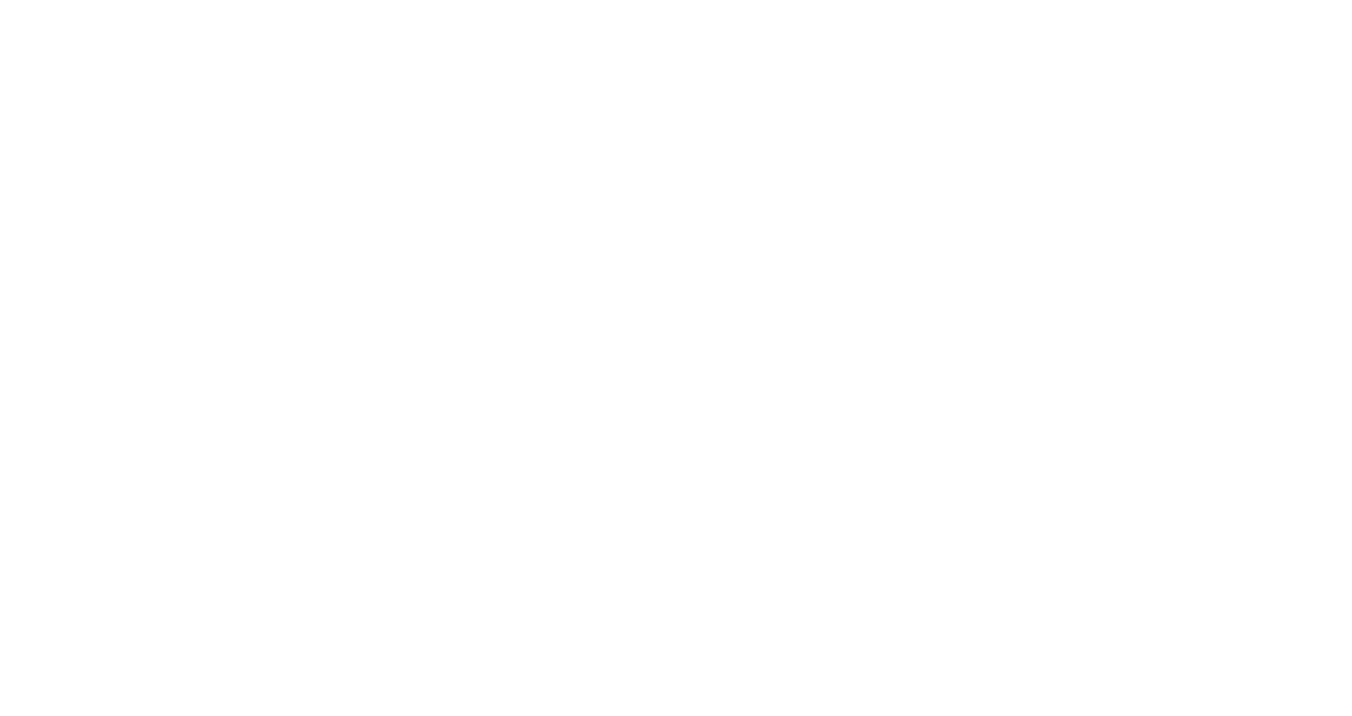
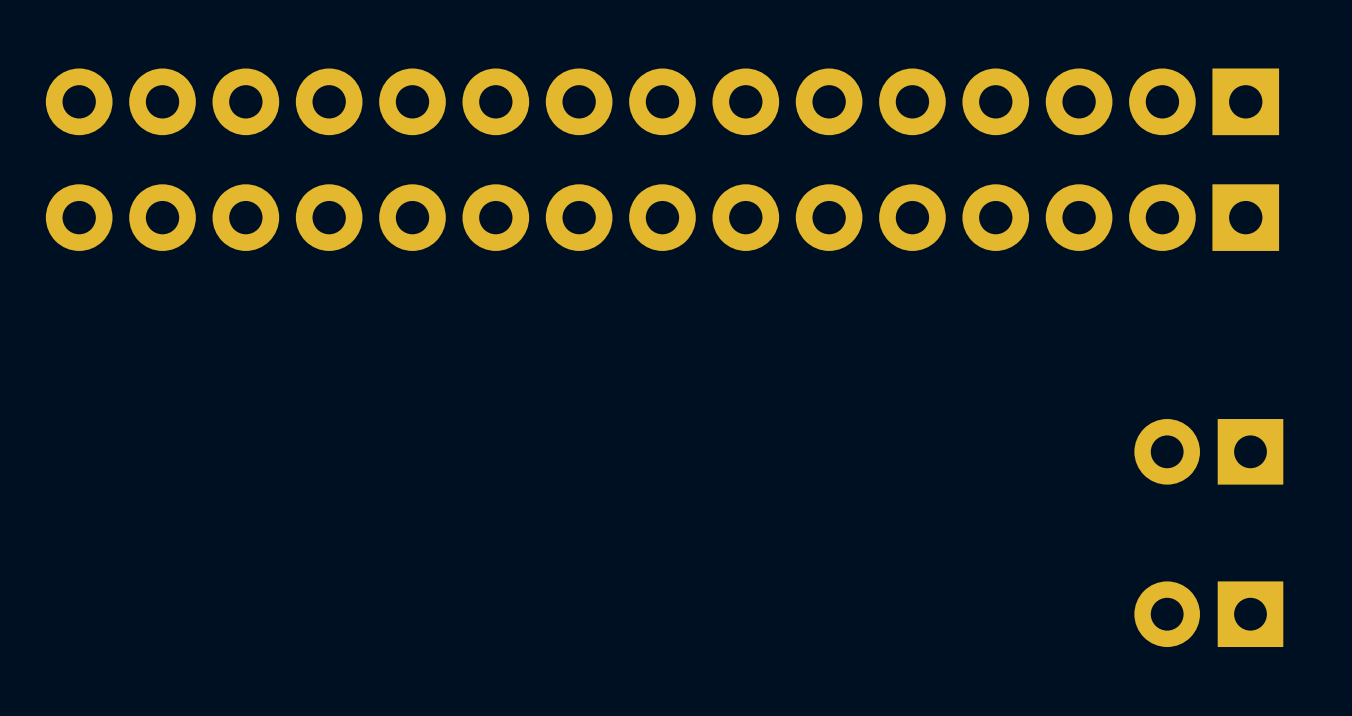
part: none -> (662, 101)
part: none -> (662, 217)
part: none -> (1208, 451)
part: none -> (1208, 614)

